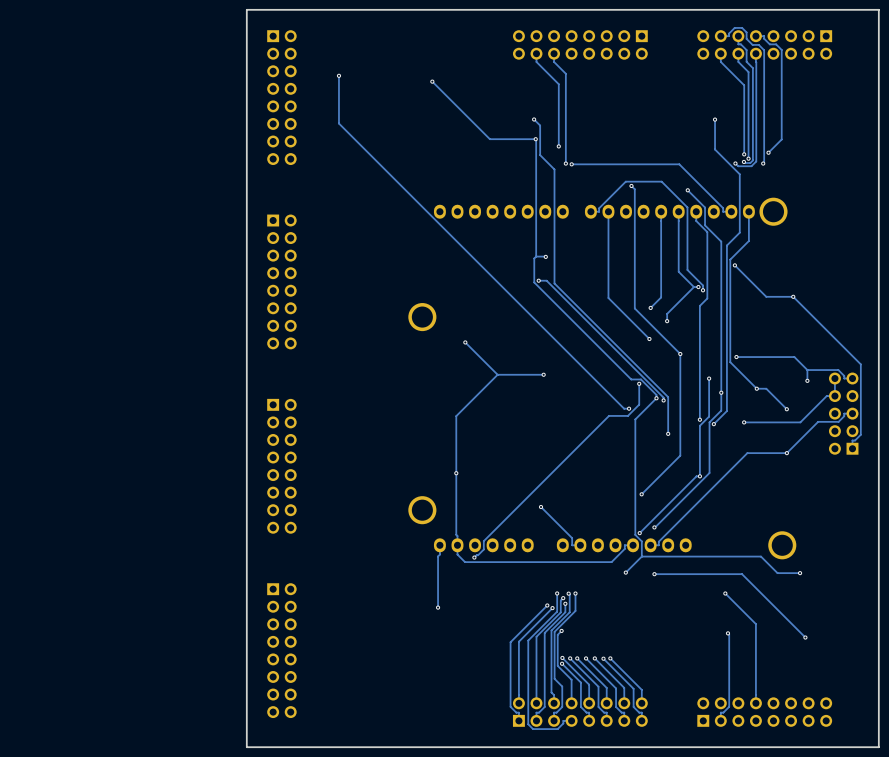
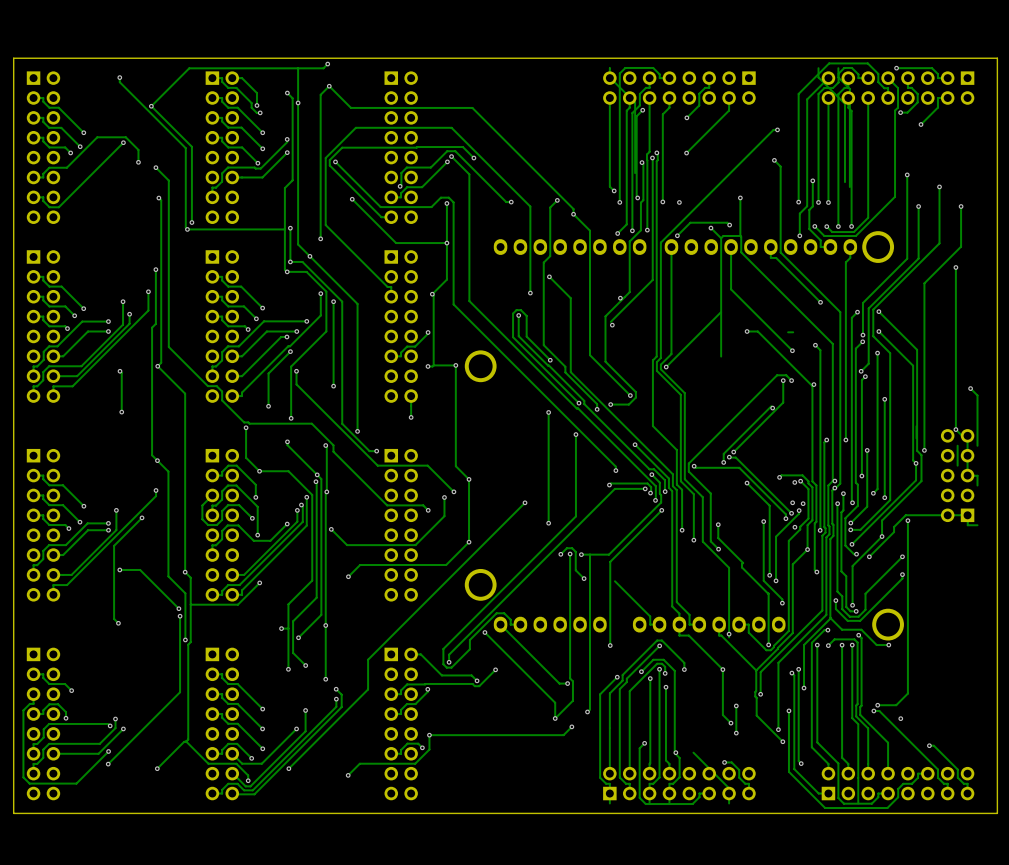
track: (720, 36) (729, 36) (734, 27) (742, 27) (746, 32) (746, 38) (752, 44) (758, 44) (764, 50) (763, 163) -> none
track: (738, 36) (738, 44) (746, 50) (746, 61) (752, 68) (752, 160) (750, 163) (743, 161) -> none
track: (755, 36) (764, 36) (769, 44) (776, 44) (781, 49) (781, 139) (768, 152) -> none
part position: (580, 44) -> (679, 88)
part position: (764, 44) -> (898, 88)
board edge: (878, 44) (878, 9) (246, 9) (246, 747) (878, 747) (878, 712) -> (997, 58) (13, 58) (13, 813) (997, 813)
track: none -> (327, 64) (323, 68) (189, 68) (151, 106) (191, 146) (191, 222)
via: none -> (327, 64)
track: none -> (298, 68) (298, 244) (357, 303) (357, 431)
track: (554, 53) (554, 61) (565, 73) (565, 163) -> none
track: (755, 53) (756, 161) (751, 166) (738, 166) (735, 163) -> none
track: none -> (896, 68) (932, 68) (937, 74) (937, 78) (947, 78)
via: none -> (896, 68)
track: none -> (119, 77) (119, 82) (185, 148) (185, 227) (187, 229) (284, 229)
via: none -> (119, 77)
track: none -> (212, 78) (222, 78) (222, 81) (228, 87) (236, 87) (251, 103) (251, 107) (256, 112) (260, 112)
track: none -> (232, 78) (242, 78) (256, 93) (256, 105)
track: none -> (649, 78) (649, 87) (645, 87) (639, 93) (639, 105) (632, 113) (632, 230)
track: none -> (669, 78) (659, 78) (659, 74) (653, 67) (625, 67) (619, 73) (619, 202)
track: none -> (709, 78) (709, 87) (705, 87) (699, 93) (699, 105) (686, 117)
track: none -> (828, 78) (807, 99) (807, 206) (799, 213) (799, 235)
track: none -> (848, 78) (848, 87) (844, 87) (838, 94) (838, 226)
track: none -> (868, 78) (858, 78) (858, 74) (851, 67) (844, 67) (838, 73) (838, 82) (832, 88) (824, 88) (818, 93) (818, 202)
track: none -> (888, 78) (898, 88) (898, 107) (895, 110) (895, 196) (855, 236) (824, 236) (814, 226)
track: none -> (907, 78) (907, 87) (911, 87) (917, 93) (917, 102) (907, 112) (900, 112)
via: none -> (329, 86)
track: none -> (287, 93) (292, 98) (292, 180) (284, 188) (284, 269) (287, 271) (306, 271) (326, 291) (326, 331) (291, 366) (291, 418)
via: none -> (287, 93)
track: (338, 75) (338, 123) (624, 408) (629, 408) -> none
via: (338, 75) -> none
track: none -> (33, 97) (43, 97) (43, 101) (49, 107) (58, 107) (83, 132)
track: none -> (212, 97) (222, 97) (222, 101) (228, 107) (237, 107) (262, 132)
track: none -> (609, 97) (609, 186) (614, 190)
track: none -> (629, 97) (629, 107) (626, 110) (626, 224) (617, 233)
track: none -> (649, 97) (649, 151) (646, 154) (647, 230)
track: none -> (669, 97) (669, 107) (662, 114) (662, 201)
track: none -> (729, 97) (729, 110) (686, 153)
track: none -> (828, 97) (828, 202)
track: none -> (848, 97) (848, 107) (851, 110) (851, 226)
track: none -> (868, 97) (868, 217) (853, 232) (832, 232) (826, 226)
track: none -> (888, 97) (888, 88) (884, 88) (878, 82) (878, 73) (867, 63) (829, 63) (798, 93) (798, 202)
track: none -> (947, 97) (937, 97) (937, 107) (921, 124)
track: (432, 81) (489, 139) (536, 139) (536, 256) -> none
via: (432, 81) -> none
via: none -> (298, 102)
via: none -> (256, 105)
via: none -> (151, 106)
track: none -> (642, 110) (636, 116) (637, 197)
via: none -> (642, 110)
via: none -> (900, 112)
via: none -> (260, 112)
track: none -> (33, 117) (43, 117) (43, 121) (49, 127) (61, 127) (80, 146)
track: none -> (212, 117) (222, 117) (222, 121) (228, 127) (241, 127) (262, 148)
part: (281, 97) -> none
via: none -> (686, 117)
via: none -> (921, 124)
track: none -> (777, 129) (773, 129) (660, 242) (660, 358) (656, 362) (656, 370) (680, 394) (680, 481) (693, 494) (693, 540)
via: none -> (777, 129)
via: none -> (83, 132)
via: none -> (262, 132)
track: none -> (33, 137) (43, 137) (43, 141) (49, 147) (65, 147) (70, 152)
track: none -> (212, 137) (222, 137) (222, 141) (228, 147) (242, 147) (257, 163)
track: none -> (287, 139) (287, 142) (260, 168) (227, 167) (222, 173) (222, 181) (216, 187) (212, 187) (212, 197)
via: none -> (287, 139)
track: none -> (123, 142) (58, 207) (49, 207) (43, 201) (43, 197) (33, 197)
via: none -> (123, 142)
track: (534, 119) (540, 125) (540, 155) (554, 169) (554, 283) (668, 397) (668, 433) -> none
via: (534, 119) -> none
track: (715, 119) (715, 149) (739, 174) (739, 232) (726, 245) (726, 411) (713, 424) -> none
via: (715, 119) -> none
part: none -> (43, 147)
via: none -> (80, 146)
part: none -> (222, 147)
part: none -> (401, 147)
via: none -> (262, 148)
via: none -> (70, 152)
track: none -> (287, 152) (262, 177) (232, 177)
via: none -> (287, 152)
track: none -> (656, 152) (656, 356) (652, 360) (652, 426) (676, 450) (676, 484) (682, 489) (682, 530)
via: none -> (656, 152)
via: none -> (686, 153)
track: none -> (451, 156) (469, 174) (469, 301) (655, 486) (655, 500)
via: none -> (451, 156)
track: none -> (473, 158) (462, 147) (342, 147) (329, 160) (329, 165) (381, 217) (391, 217)
via: none -> (473, 158)
track: none -> (652, 157) (652, 279) (610, 321)
via: none -> (652, 157)
track: none -> (774, 160) (780, 166) (780, 252) (840, 312) (840, 483) (832, 490) (833, 535) (830, 539) (830, 617) (842, 629) (861, 629) (876, 645) (888, 645)
via: none -> (774, 160)
track: none -> (138, 162) (138, 149) (125, 137) (97, 137) (66, 167) (49, 167) (43, 173) (43, 177) (33, 177)
via: none -> (138, 162)
track: none -> (335, 161) (380, 207) (431, 207) (440, 197) (448, 197) (453, 202) (453, 304) (615, 466) (615, 470)
via: none -> (335, 161)
track: none -> (447, 161) (422, 187) (407, 187) (401, 193) (401, 197) (391, 197)
via: none -> (447, 161)
via: none -> (257, 163)
track: none -> (642, 162) (643, 200) (640, 202) (640, 230) (629, 241) (629, 292) (605, 316) (605, 361) (635, 392) (635, 397) (628, 404) (610, 404)
via: none -> (642, 162)
via: (535, 139) -> none
track: none -> (155, 167) (168, 180) (168, 347) (207, 386) (216, 386) (222, 391) (222, 400) (244, 422) (311, 423) (333, 445) (333, 451) (387, 505) (423, 505) (428, 510)
via: none -> (155, 167)
via: (558, 146) -> none
track: none -> (907, 174) (907, 258) (862, 302) (862, 335)
via: none -> (907, 174)
via: (768, 152) -> none
via: none -> (812, 180)
via: (744, 154) -> none
track: none -> (400, 186) (401, 172) (406, 167) (430, 167) (447, 151) (455, 151) (506, 202) (511, 202)
via: none -> (400, 186)
via: (748, 158) -> none
track: none -> (939, 186) (939, 243) (873, 309) (873, 336) (890, 353) (890, 500) (860, 529) (850, 529)
via: none -> (939, 186)
via: (743, 161) -> none
via: none -> (614, 190)
via: (565, 163) -> none
via: (735, 163) -> none
via: (763, 163) -> none
track: (571, 164) (679, 164) (723, 208) (723, 211) -> (812, 180) (812, 206) (809, 209) (809, 229) (820, 240) (821, 247)
via: (571, 164) -> none
track: none -> (158, 198) (161, 200) (161, 362) (157, 366) (185, 393) (185, 572) (190, 577) (188, 739) (186, 741)
via: none -> (158, 198)
via: none -> (637, 197)
track: none -> (740, 197) (740, 235)
via: none -> (740, 197)
track: none -> (352, 199) (396, 243) (446, 243)
via: none -> (352, 199)
track: none -> (557, 200) (550, 207) (550, 256) (543, 262) (543, 345) (565, 366) (565, 372) (597, 404) (597, 409)
via: none -> (557, 200)
via: none -> (662, 201)
via: none -> (511, 202)
via: none -> (619, 202)
via: none -> (679, 202)
via: none -> (798, 202)
via: none -> (818, 202)
via: none -> (828, 202)
track: none -> (446, 203) (446, 279) (432, 294) (433, 365)
via: none -> (446, 203)
track: none -> (918, 206) (918, 258) (868, 308) (868, 363) (861, 371)
via: none -> (918, 206)
track: none -> (961, 206) (961, 246) (924, 283) (924, 450)
via: none -> (961, 206)
via: none -> (573, 214)
track: (631, 185) (634, 189) (634, 203) -> none
via: (631, 185) -> none
via: none -> (191, 222)
track: (687, 190) (705, 207) (705, 225) (721, 241) (721, 410) (709, 422) (709, 473) (654, 527) -> none
via: (687, 190) -> none
track: none -> (729, 225) (727, 222) (690, 222) (677, 235)
via: none -> (729, 225)
via: none -> (814, 226)
via: none -> (826, 226)
via: none -> (838, 226)
via: none -> (851, 226)
track: none -> (710, 228) (721, 238) (723, 235) (740, 235)
via: none -> (710, 228)
track: none -> (290, 228) (290, 261) (302, 261) (342, 301) (342, 423) (369, 451) (376, 451)
via: none -> (290, 228)
via: none -> (187, 229)
via: none -> (647, 230)
via: none -> (632, 230)
via: none -> (617, 233)
via: none -> (677, 235)
track: none -> (740, 235) (741, 252) (832, 343) (832, 481)
via: none -> (799, 235)
track: none -> (320, 238) (320, 94) (329, 86) (351, 107) (472, 107) (573, 209) (573, 214) (589, 230) (589, 355) (630, 395)
via: none -> (320, 238)
via: none -> (446, 243)
track: (590, 211) (599, 211) (599, 208) (625, 181) (661, 181) (687, 207) (687, 269) (703, 285) (703, 290) -> none
track: (608, 211) (608, 298) (649, 339) -> none
track: none -> (731, 247) (731, 289) (792, 350)
track: (661, 211) (661, 297) (650, 307) -> none
track: (696, 211) (696, 221) (707, 232) (707, 298) (699, 305) (699, 419) -> none
via: none -> (309, 256)
track: (678, 221) (678, 271) (693, 287) (667, 313) (667, 321) -> (770, 257) (776, 257) (820, 302)
track: (748, 221) (748, 241) (730, 259) (730, 362) (756, 388) (766, 388) (786, 409) -> (850, 257) (845, 262) (845, 439)
via: none -> (290, 261)
track: none -> (955, 267) (955, 429) (967, 441) (967, 469) (973, 475) (977, 475) (977, 485)
via: none -> (955, 267)
track: none -> (155, 269) (155, 323) (152, 327) (152, 455) (168, 471) (168, 576) (185, 593) (185, 639)
via: none -> (155, 269)
via: none -> (287, 271)
track: none -> (33, 276) (43, 276) (43, 280) (49, 286) (61, 286) (83, 308)
track: none -> (212, 276) (222, 276) (222, 280) (228, 286) (241, 286) (262, 308)
track: none -> (549, 276) (570, 298) (570, 372) (672, 474) (672, 486) (676, 490) (676, 602) (689, 614) (689, 624) (699, 624)
via: none -> (549, 276)
track: none -> (148, 291) (148, 310) (72, 386) (53, 386) (53, 396)
via: none -> (148, 291)
track: none -> (320, 293) (320, 315) (242, 392) (242, 396) (232, 396)
via: none -> (320, 293)
track: none -> (530, 293) (530, 206) (451, 127) (355, 127) (325, 158) (325, 225) (387, 286) (391, 286) (391, 296)
via: none -> (530, 293)
via: none -> (432, 294)
track: none -> (33, 296) (43, 296) (43, 300) (49, 306) (65, 306) (74, 315)
track: none -> (212, 296) (222, 296) (222, 300) (228, 306) (244, 306) (256, 318)
track: (536, 256) (534, 258) (534, 282) (631, 379) (641, 379) (656, 394) (656, 398) (635, 419) (635, 534) (641, 541) -> (671, 247) (671, 354) (660, 364) (660, 369) (684, 393) (684, 479) (702, 497) (702, 541) (729, 567) (729, 620)
track: (536, 256) (545, 256) -> none
track: none -> (123, 301) (123, 324) (81, 366) (49, 366) (43, 372) (43, 380) (37, 386) (33, 386) (33, 396)
via: none -> (123, 301)
track: none -> (333, 301) (333, 386)
via: none -> (333, 301)
via: none -> (820, 302)
via: none -> (262, 308)
track: (734, 265) (766, 296) (793, 296) (860, 364) (860, 434) (852, 440) (852, 448) -> none
via: (734, 265) -> none
via: none -> (83, 308)
track: none -> (878, 311) (917, 349) (917, 450) (921, 455) (921, 481) (882, 520) (882, 536) (852, 566) (852, 605)
via: none -> (878, 311)
track: none -> (721, 312) (666, 367)
track: none -> (857, 312) (851, 317) (852, 502)
via: none -> (857, 312)
track: none -> (129, 314) (129, 323) (77, 376) (53, 376)
via: none -> (129, 314)
via: none -> (74, 315)
track: none -> (518, 315) (518, 336) (649, 469) (654, 469) (664, 480) (665, 491)
via: none -> (518, 315)
track: none -> (33, 316) (43, 316) (43, 320) (49, 326) (65, 326) (67, 328)
track: none -> (212, 316) (222, 316) (222, 320) (228, 326) (244, 326) (248, 329)
via: none -> (256, 318)
track: none -> (108, 321) (82, 321) (57, 346) (49, 346) (43, 351) (43, 359) (37, 366) (33, 366) (33, 376)
via: none -> (108, 321)
track: none -> (306, 321) (263, 321) (238, 346) (227, 346) (222, 352) (222, 360) (216, 366) (212, 366) (212, 376)
via: none -> (306, 321)
track: (538, 280) (546, 280) (663, 397) (663, 400) -> none
part: none -> (43, 326)
part: none -> (222, 326)
part: (281, 281) -> none
part: none -> (401, 326)
via: none -> (67, 328)
via: none -> (248, 329)
track: none -> (108, 331) (88, 331) (63, 356) (53, 356)
via: none -> (108, 331)
track: none -> (296, 331) (266, 331) (242, 356) (232, 356)
via: none -> (296, 331)
track: none -> (747, 331) (757, 331) (812, 386)
via: none -> (747, 331)
track: none -> (878, 331) (913, 365) (913, 460) (916, 463) (916, 480) (851, 544)
via: none -> (878, 331)
track: none -> (428, 332) (415, 346) (407, 346) (401, 352) (401, 356) (391, 356)
via: none -> (428, 332)
via: (698, 287) -> none
via: none -> (862, 335)
via: (703, 290) -> none
track: none -> (286, 336) (281, 336) (242, 376) (232, 376)
via: none -> (286, 336)
track: none -> (862, 341) (855, 348) (855, 482) (857, 484) (857, 505) (845, 518) (845, 545) (853, 554) (856, 554)
via: none -> (862, 341)
via: (793, 296) -> none
track: none -> (815, 345) (820, 350) (820, 530)
via: none -> (815, 345)
via: none -> (792, 350)
track: none -> (290, 351) (268, 373) (268, 406)
via: none -> (290, 351)
track: none -> (877, 353) (877, 489) (873, 493)
via: none -> (877, 353)
via: (650, 307) -> none
track: (634, 308) (680, 354) (680, 455) (641, 494) -> none
track: none -> (550, 360) (526, 336) (526, 315) (520, 310) (516, 310) (513, 313) (513, 337) (578, 403)
via: none -> (550, 360)
track: none -> (433, 365) (455, 365) (455, 466) (469, 479) (469, 542) (446, 565) (360, 565) (348, 576)
track: none -> (433, 365) (427, 366)
via: none -> (455, 365)
via: none -> (157, 366)
via: none -> (427, 366)
via: none -> (666, 367)
track: none -> (120, 371) (121, 373) (121, 412)
via: none -> (120, 371)
track: none -> (296, 371) (296, 384) (377, 465) (427, 465) (453, 491)
via: none -> (296, 371)
via: (667, 321) -> none
via: none -> (861, 371)
track: none -> (865, 376) (861, 380) (861, 476)
via: none -> (865, 376)
track: none -> (783, 380) (783, 402) (733, 452)
via: none -> (783, 380)
track: none -> (791, 380) (786, 375) (777, 375) (688, 463) (688, 471) (710, 493) (710, 541) (718, 549)
via: none -> (791, 380)
via: none -> (813, 384)
via: none -> (333, 386)
track: none -> (812, 386) (812, 481) (816, 485) (814, 569) (816, 572)
track: none -> (970, 388) (977, 395) (977, 445)
via: none -> (970, 388)
via: (649, 339) -> none
track: (465, 342) (497, 374) -> none
via: (465, 342) -> none
via: none -> (630, 395)
track: none -> (411, 396) (411, 417)
track: none -> (884, 399) (884, 497)
via: none -> (884, 399)
via: none -> (578, 403)
via: none -> (610, 404)
via: none -> (268, 406)
track: none -> (771, 406) (723, 453) (723, 462)
via: none -> (597, 409)
via: none -> (121, 412)
track: none -> (548, 412) (548, 523)
via: none -> (548, 412)
track: (736, 357) (794, 357) (807, 370) (838, 370) (844, 378) (852, 378) -> none
via: (736, 357) -> none
via: none -> (411, 417)
via: none -> (291, 418)
track: none -> (246, 427) (246, 457) (259, 471) (288, 471) (312, 494) (312, 580) (288, 604) (288, 669)
via: none -> (246, 427)
via: none -> (955, 429)
via: none -> (357, 431)
track: (497, 374) (456, 416) (457, 554) (465, 562) (611, 562) (624, 548) (624, 545) (633, 545) -> (756, 670) (719, 635) (719, 624)
track: (543, 374) (497, 374) -> none
via: (543, 374) -> none
track: none -> (575, 434) (575, 516) (443, 648) (443, 664) (446, 667) (451, 667) (469, 649) (469, 640) (496, 613) (504, 613) (510, 619) (510, 624) (520, 624)
via: none -> (575, 434)
track: (709, 378) (709, 416) (699, 425) (699, 476) (696, 476) (639, 533) -> none
via: (709, 378) -> none
track: (834, 378) (834, 396) (826, 396) (800, 422) (744, 422) -> none
via: (807, 380) -> none
track: none -> (826, 439) (824, 442) (825, 532) (822, 535) (822, 610) (760, 672) (760, 694)
via: none -> (826, 439)
via: none -> (845, 439)
track: none -> (287, 441) (287, 445) (321, 479) (321, 614) (298, 637)
via: none -> (287, 441)
track: (639, 383) (639, 404) (627, 415) (609, 415) (483, 541) (483, 549) (474, 557) -> none
via: (639, 383) -> none
track: none -> (635, 444) (668, 478) (668, 487) (672, 491) (672, 606) (679, 613) (679, 635) (688, 635) (722, 669) (722, 715) (730, 723)
via: none -> (635, 444)
track: none -> (325, 445) (325, 679)
via: none -> (325, 445)
track: none -> (957, 445) (957, 465)
via: (756, 388) -> none
track: none -> (867, 450) (867, 506) (850, 523)
via: none -> (867, 450)
via: none -> (924, 450)
via: none -> (376, 451)
via: none -> (733, 452)
via: (721, 392) -> none
track: none -> (729, 457) (735, 457) (791, 513)
via: none -> (729, 457)
via: (656, 398) -> none
via: none -> (157, 460)
via: (663, 400) -> none
via: none -> (723, 462)
via: none -> (916, 463)
track: none -> (694, 466) (695, 467) (739, 467) (785, 514) (785, 518)
via: none -> (694, 466)
via: (629, 408) -> none
via: none -> (259, 471)
via: none -> (615, 470)
via: (786, 409) -> none
track: none -> (651, 474) (659, 482) (661, 502) (609, 554) (581, 554)
via: none -> (651, 474)
track: none -> (33, 475) (43, 475) (43, 479) (49, 485) (63, 485) (83, 506)
track: none -> (212, 475) (222, 475) (222, 471) (228, 465) (236, 465) (255, 484) (255, 497)
via: none -> (317, 474)
track: (852, 413) (844, 413) (838, 421) (818, 421) (786, 453) (747, 453) (658, 541) (658, 545) -> (800, 481) (808, 489) (808, 518) (788, 540) (788, 631) (770, 650) (766, 650) (748, 632) (748, 624)
via: none -> (861, 476)
track: none -> (779, 477) (781, 475) (802, 475) (808, 481) (812, 487) (812, 520) (807, 525) (807, 549) (792, 564) (792, 633) (756, 670)
via: none -> (779, 477)
via: none -> (469, 479)
via: none -> (800, 481)
track: none -> (832, 481) (828, 485) (829, 534) (826, 537) (826, 614) (778, 662) (778, 729)
via: none -> (834, 481)
track: none -> (315, 481) (316, 597) (293, 621) (293, 652) (305, 665)
via: none -> (315, 481)
track: none -> (747, 483) (769, 505) (769, 575)
via: none -> (747, 483)
track: none -> (609, 485) (647, 483) (651, 487) (650, 493)
via: none -> (609, 485)
via: (744, 422) -> none
via: (713, 424) -> none
via: none -> (834, 488)
track: none -> (645, 488) (614, 488) (449, 654) (449, 662)
via: none -> (645, 488)
track: none -> (156, 490) (156, 496) (67, 585) (53, 585) (53, 594)
via: none -> (156, 490)
via: none -> (665, 491)
via: none -> (326, 491)
via: none -> (453, 491)
via: none -> (650, 493)
track: none -> (843, 493) (843, 510) (841, 512) (841, 571) (846, 576) (846, 607) (850, 611) (856, 611)
via: none -> (843, 493)
via: none -> (873, 493)
track: none -> (33, 495) (43, 495) (43, 499) (49, 505) (63, 505) (79, 522)
track: none -> (212, 495) (202, 505) (202, 519) (208, 525) (216, 525) (222, 519) (222, 511) (228, 505) (239, 505) (252, 518)
via: none -> (255, 497)
track: none -> (306, 497) (306, 525) (242, 590) (242, 594) (232, 594)
via: none -> (306, 497)
track: none -> (444, 497) (444, 516) (415, 545) (347, 545) (331, 529)
via: none -> (444, 497)
via: (668, 433) -> none
via: none -> (884, 497)
via: none -> (655, 500)
track: none -> (525, 502) (368, 659) (368, 689) (288, 768)
via: none -> (525, 502)
via: none -> (792, 502)
via: none -> (852, 502)
via: none -> (803, 503)
track: none -> (837, 503) (837, 591) (842, 596) (842, 609) (849, 616) (858, 616) (865, 609) (865, 593) (902, 556)
via: none -> (837, 503)
track: none -> (301, 505) (302, 521) (239, 585) (228, 585) (222, 591) (222, 594) (212, 594)
via: none -> (301, 505)
via: none -> (83, 506)
track: none -> (116, 510) (116, 530) (71, 574) (53, 574)
via: none -> (116, 510)
track: none -> (297, 510) (297, 521) (244, 574) (232, 574)
via: none -> (297, 510)
via: none -> (428, 510)
track: none -> (661, 510) (610, 561) (610, 645)
via: none -> (661, 510)
track: none -> (799, 510) (799, 513) (776, 536) (776, 580)
via: none -> (799, 510)
via: none -> (791, 513)
track: none -> (33, 515) (43, 515) (43, 518) (49, 525) (65, 525) (68, 528)
track: none -> (212, 515) (212, 505) (216, 505) (222, 499) (222, 491) (227, 485) (236, 485) (257, 506) (257, 535)
track: none -> (142, 517) (114, 545) (114, 618) (118, 623)
via: none -> (142, 517)
via: none -> (252, 518)
via: none -> (785, 518)
via: (786, 453) -> none
track: none -> (907, 520) (907, 693) (896, 705) (877, 705)
via: none -> (907, 520)
via: none -> (79, 522)
track: none -> (763, 521) (763, 580) (782, 599) (782, 603)
via: none -> (763, 521)
track: none -> (108, 523) (87, 523) (65, 545) (49, 545) (43, 550) (43, 559) (37, 565) (33, 565) (33, 574)
via: none -> (108, 523)
via: none -> (548, 523)
via: none -> (850, 523)
track: none -> (287, 524) (270, 540) (253, 540) (238, 525) (227, 525) (222, 531) (222, 539) (216, 545) (212, 545) (212, 555)
via: none -> (287, 524)
part: none -> (43, 525)
part: none -> (222, 525)
part: none -> (401, 525)
track: none -> (718, 524) (718, 538) (743, 563) (741, 567) (768, 593) (768, 644)
via: none -> (718, 524)
track: none -> (977, 525) (967, 525) (967, 521) (961, 515) (905, 515) (894, 526) (894, 532) (869, 556)
via: none -> (794, 527)
via: none -> (68, 528)
track: none -> (108, 530) (88, 530) (63, 555) (53, 555)
via: none -> (108, 530)
via: none -> (331, 529)
via: none -> (682, 530)
via: none -> (850, 529)
via: none -> (820, 530)
via: none -> (257, 535)
part: (281, 466) -> none
via: none -> (882, 536)
via: none -> (693, 540)
via: none -> (469, 542)
via: (456, 473) -> none
via: none -> (851, 544)
via: (699, 476) -> none
via: none -> (807, 549)
track: none -> (570, 553) (570, 678) (572, 681) (572, 700) (555, 718) (555, 702) (484, 632)
via: none -> (570, 553)
track: none -> (560, 554) (566, 548) (572, 548) (575, 551) (575, 570) (584, 578)
via: none -> (560, 554)
via: none -> (581, 554)
track: none -> (589, 554) (589, 709) (587, 711)
via: none -> (856, 554)
via: none -> (869, 556)
via: none -> (902, 556)
via position: (641, 494) -> (718, 549)
track: none -> (119, 569) (140, 569) (178, 608)
via: none -> (119, 569)
via: none -> (185, 572)
via: none -> (816, 572)
via: none -> (769, 575)
track: none -> (902, 574) (902, 578) (860, 620) (847, 620) (835, 609) (835, 600)
via: none -> (902, 574)
via: none -> (348, 576)
via: none -> (584, 578)
via: none -> (776, 580)
via: (541, 507) -> none
track: none -> (259, 582) (237, 604) (190, 604)
via: none -> (259, 582)
via: none -> (835, 600)
via: none -> (782, 603)
via: (654, 527) -> none
via: none -> (852, 605)
via: none -> (178, 608)
via: (639, 533) -> none
via: none -> (856, 611)
track: none -> (180, 616) (180, 692) (108, 764)
via: none -> (180, 616)
track: none -> (830, 618) (804, 644) (804, 688)
via: none -> (118, 623)
track: (439, 545) (439, 554) (438, 556) (438, 607) -> (500, 624) (559, 683) (567, 683)
via: none -> (325, 625)
via: none -> (281, 628)
track: none -> (288, 628) (281, 628)
track: none -> (827, 630) (824, 630) (811, 642) (811, 747) (828, 763) (828, 773)
via: none -> (827, 630)
via: none -> (484, 632)
via: none -> (729, 634)
track: none -> (858, 635) (861, 638) (860, 714) (888, 742) (888, 773)
via: none -> (858, 635)
via: none -> (298, 637)
via: (474, 557) -> none
via: none -> (185, 639)
via: none -> (610, 645)
via: none -> (768, 644)
track: none -> (817, 645) (817, 742) (838, 763) (838, 798) (843, 803) (871, 803) (878, 797) (878, 793) (888, 793)
via: none -> (817, 645)
track: none -> (828, 645) (834, 639) (854, 639) (857, 642) (856, 716) (868, 728) (868, 773)
via: none -> (828, 645)
track: none -> (842, 645) (842, 757) (848, 763) (848, 773)
via: none -> (842, 645)
via: none -> (852, 645)
track: none -> (659, 645) (626, 678) (626, 682) (619, 689) (619, 777) (626, 783) (629, 783) (629, 793)
via: none -> (659, 645)
track: none -> (411, 654) (420, 654) (441, 675) (471, 675) (477, 680)
track: (625, 572) (641, 556) (760, 556) (777, 573) (800, 573) -> none
via: (625, 572) -> none
via position: (800, 573) -> (888, 645)
track: (654, 574) (742, 574) (805, 637) -> none
via: (654, 574) -> none
via: none -> (449, 662)
via: none -> (305, 665)
via: none -> (288, 669)
via: none -> (659, 669)
track: none -> (798, 669) (798, 761) (801, 763)
via: none -> (798, 669)
track: none -> (495, 669) (479, 686) (472, 683) (407, 684) (401, 690) (401, 694) (391, 694)
via: none -> (495, 669)
via: none -> (684, 669)
via: none -> (722, 669)
track: none -> (756, 670) (756, 715) (782, 741)
via: none -> (641, 671)
track: none -> (665, 673) (665, 666) (662, 663) (657, 663) (629, 691) (629, 773)
via: none -> (665, 673)
track: none -> (791, 673) (794, 675) (794, 769) (818, 793) (828, 793)
via: none -> (791, 673)
track: none -> (33, 674) (43, 674) (43, 677) (49, 684) (65, 684) (71, 690)
track: none -> (212, 674) (222, 674) (222, 677) (228, 684) (237, 684) (262, 709)
via: none -> (617, 677)
track: none -> (650, 678) (649, 773)
via: none -> (650, 678)
via: none -> (325, 679)
track: (557, 593) (557, 611) (528, 640) (528, 724) (533, 729) (557, 729) (563, 720) (571, 720) -> none
via: (557, 593) -> none
track: (568, 593) (569, 612) (551, 630) (551, 692) (554, 695) (554, 703) -> none
via: (568, 593) -> none
track: (575, 593) (575, 610) (554, 631) (554, 678) (562, 686) (562, 706) (554, 712) (554, 720) -> none
via: (575, 593) -> none
track: (725, 593) (755, 624) (755, 633) -> (852, 645) (852, 718) (858, 724)
via: (725, 593) -> none
via: none -> (477, 680)
via: none -> (567, 683)
track: (563, 598) (560, 600) (560, 612) (536, 636) -> (684, 669) (684, 662) (661, 640) (657, 640) (622, 675) (622, 680) (609, 693) (609, 728)
via: (563, 598) -> none
track: none -> (665, 687) (665, 760) (669, 763) (669, 773)
via: none -> (665, 687)
via: none -> (804, 688)
track: none -> (336, 689) (341, 694) (341, 707) (254, 794) (232, 793)
via: none -> (336, 689)
track: none -> (427, 689) (427, 691) (415, 704) (406, 704) (401, 710) (401, 714) (391, 714)
via: none -> (427, 689)
via: none -> (71, 690)
track: (565, 603) (565, 612) (544, 632) (544, 706) (536, 712) (536, 720) -> none
via: (565, 603) -> none
track: (547, 605) (510, 642) (510, 706) (518, 712) (518, 720) -> none
via: (547, 605) -> none
track: none -> (33, 694) (33, 703) (29, 703) (23, 710) (23, 777) (29, 783) (76, 783) (108, 751)
track: none -> (212, 694) (222, 694) (222, 697) (228, 703) (237, 703) (262, 728)
via: none -> (760, 694)
via: (438, 607) -> none
track: (552, 608) (518, 641) (518, 703) -> none
via: (552, 608) -> none
track: none -> (336, 699) (336, 706) (252, 790) (244, 790) (237, 783) (228, 783) (222, 789) (222, 793) (212, 793)
via: none -> (336, 699)
via: none -> (877, 705)
track: none -> (736, 705) (736, 733)
via: none -> (736, 705)
via: none -> (262, 709)
track: none -> (305, 710) (305, 731) (250, 786) (245, 786) (232, 773)
via: none -> (305, 710)
track: none -> (788, 710) (788, 771) (825, 808) (887, 808) (898, 797) (898, 788) (903, 783) (911, 783) (918, 777) (918, 773) (927, 773)
via: none -> (788, 710)
track: none -> (873, 710) (879, 710) (937, 769) (937, 777) (944, 783) (947, 783) (947, 793)
via: none -> (873, 710)
via: none -> (587, 711)
track: none -> (33, 714) (43, 714) (43, 710) (49, 704) (58, 704) (65, 712) (65, 718)
track: none -> (212, 714) (222, 714) (222, 717) (228, 723) (237, 723) (262, 748)
via: none -> (65, 718)
track: none -> (115, 719) (115, 728) (99, 743) (49, 743) (43, 749) (43, 757) (37, 763) (33, 763) (33, 773)
via: none -> (115, 719)
via: none -> (555, 718)
via: none -> (900, 718)
track: (561, 630) (557, 634) (557, 665) (571, 679) (571, 685) -> (659, 669) (659, 777) (653, 783) (649, 783)
via: (561, 630) -> none
via: none -> (730, 723)
part: none -> (43, 723)
part: none -> (222, 723)
part: none -> (401, 723)
track: (727, 633) (729, 706) (720, 712) (720, 720) -> none
via: (727, 633) -> none
track: none -> (110, 725) (108, 723) (49, 723) (43, 729) (43, 737) (37, 744) (33, 744) (33, 753)
via: none -> (110, 725)
track: none -> (571, 726) (563, 735) (429, 735) (429, 749) (415, 763) (359, 763) (348, 775)
via: none -> (571, 726)
track: none -> (123, 728) (98, 753) (53, 753)
via: none -> (123, 728)
via: none -> (262, 728)
track: none -> (296, 728) (261, 763) (242, 763) (232, 753)
via: none -> (296, 728)
via: (805, 637) -> none
via: none -> (778, 729)
via: none -> (736, 733)
via: none -> (429, 735)
track: none -> (186, 741) (157, 768)
track: none -> (186, 741) (208, 763) (236, 763) (248, 775) (248, 780)
via: none -> (782, 741)
part: (281, 650) -> none
track: none -> (644, 743) (639, 748) (639, 797) (645, 804) (692, 804) (699, 797) (699, 793) (709, 793)
via: none -> (644, 743)
track: none -> (929, 745) (933, 745) (957, 769) (957, 777) (963, 783) (967, 783) (967, 793)
via: none -> (929, 745)
track: none -> (422, 747) (418, 743) (407, 743) (401, 750) (401, 753) (391, 753)
via: none -> (422, 747)
via: none -> (262, 748)
via: none -> (108, 751)
track: (562, 657) (589, 685) -> (641, 671) (653, 659) (663, 659) (674, 670) (674, 753) (679, 757) (679, 777) (673, 783) (669, 783)
via: (562, 657) -> none
track: (570, 658) (598, 686) (598, 706) (606, 712) (606, 720) -> none
via: (570, 658) -> none
track: (577, 658) (606, 687) (606, 703) -> none
via: (577, 658) -> none
track: (586, 658) (616, 688) (616, 706) (624, 712) (624, 720) -> none
via: (586, 658) -> none
track: (594, 658) (624, 687) (624, 703) -> none
track: (603, 658) (633, 688) (633, 706) (641, 712) (641, 720) -> none
via: (603, 658) -> none
via: (610, 658) -> none
track: none -> (212, 753) (222, 753) (222, 750) (228, 743) (237, 743) (251, 758)
via: none -> (251, 758)
track: (562, 663) (580, 682) (580, 706) (589, 712) (589, 720) -> none
via: (562, 663) -> none
track: none -> (724, 762) (731, 762) (739, 769) (739, 777) (745, 783) (748, 783) (748, 793)
via: none -> (724, 762)
via: none -> (108, 764)
via: none -> (801, 763)
via: none -> (157, 768)
via: none -> (288, 768)
track: (536, 676) (536, 685) -> (617, 677) (600, 694) (600, 777) (606, 783) (609, 783)
via: none -> (348, 775)
via: none -> (248, 780)
part position: (580, 712) -> (679, 783)
part position: (764, 712) -> (898, 783)

